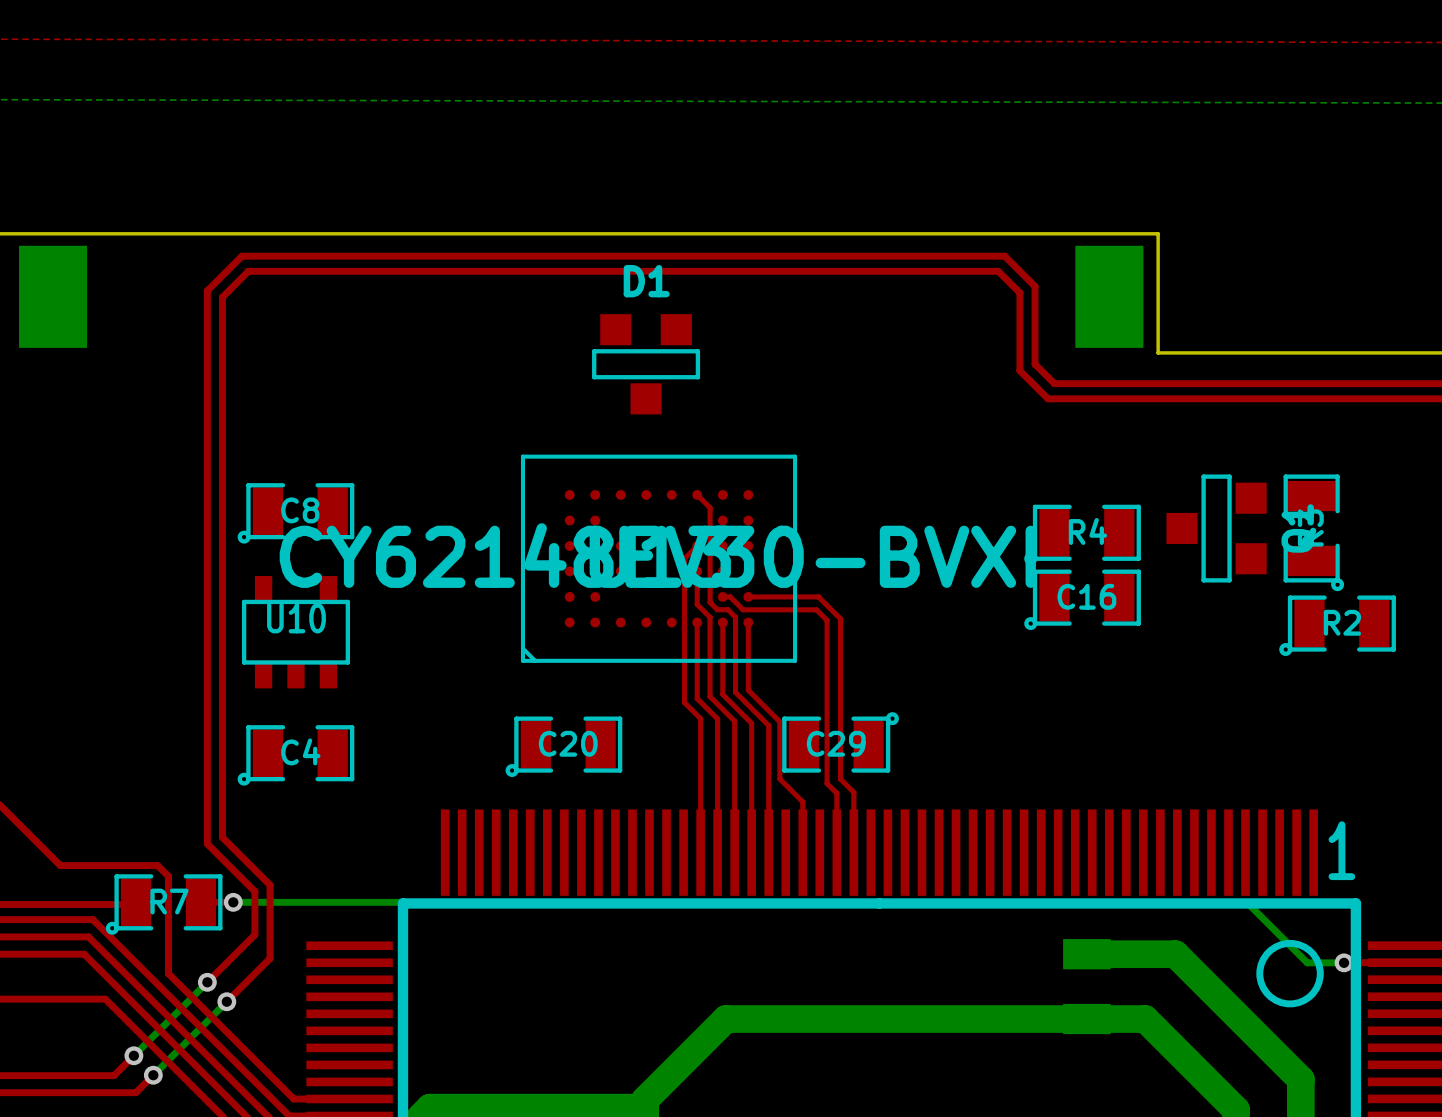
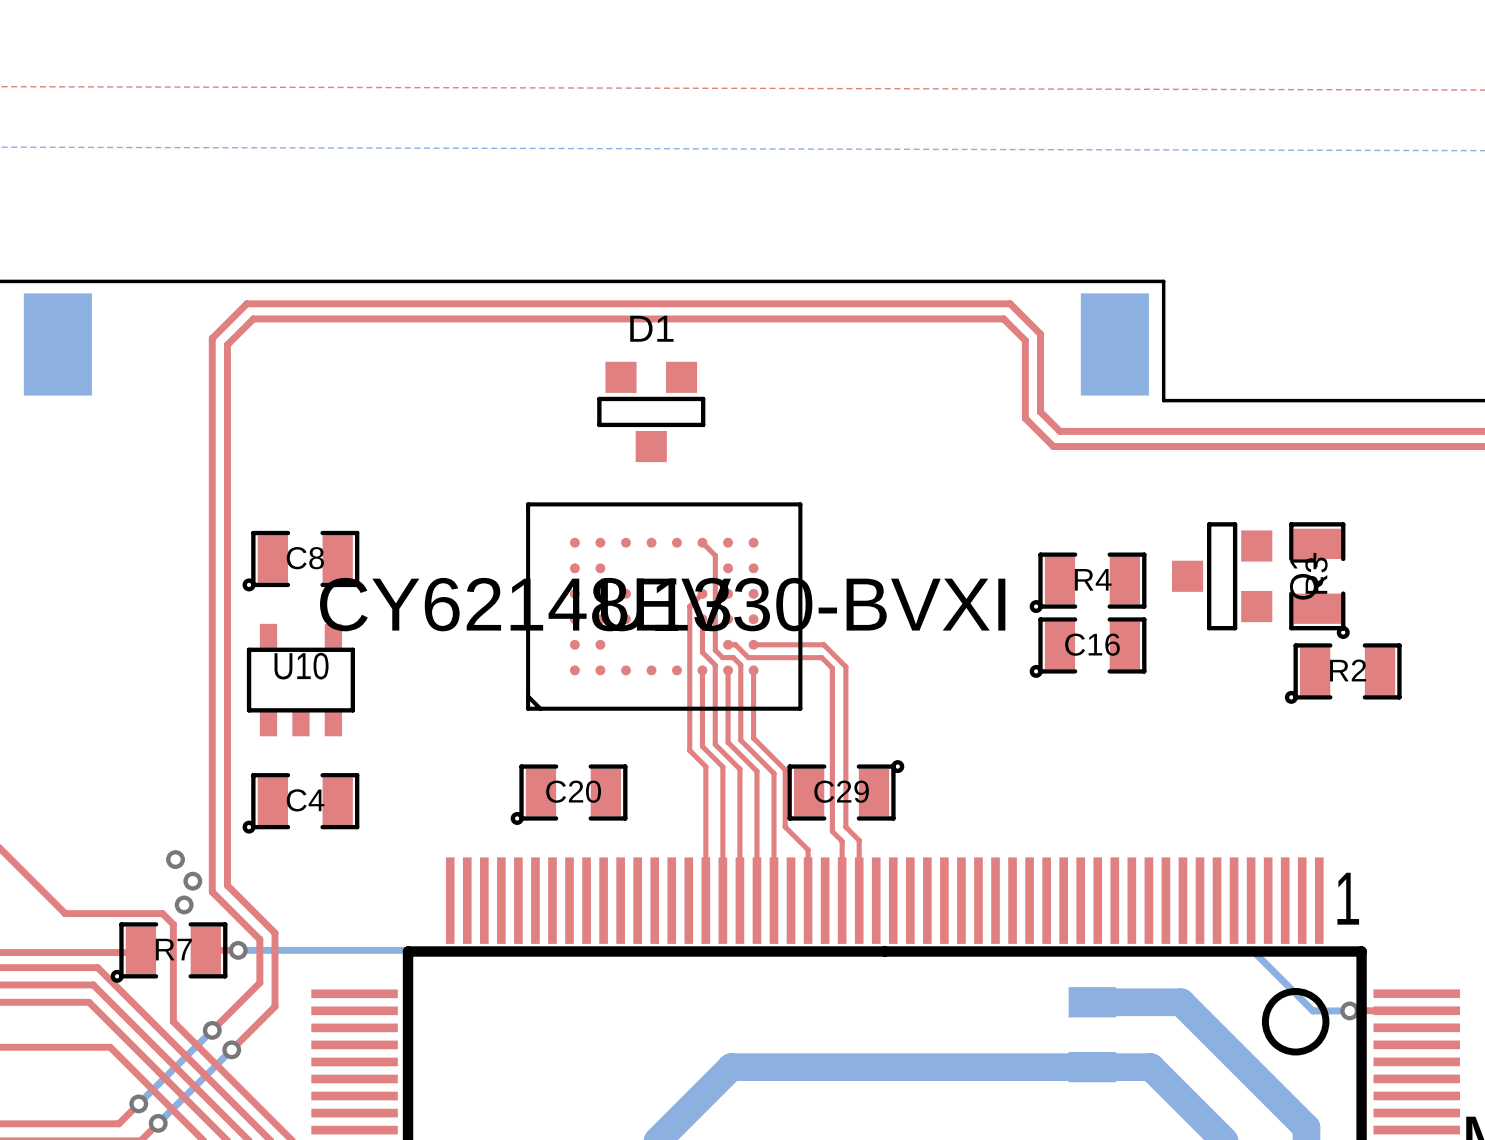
via: none -> (175, 859)
via: none -> (192, 881)
via: none -> (184, 904)

